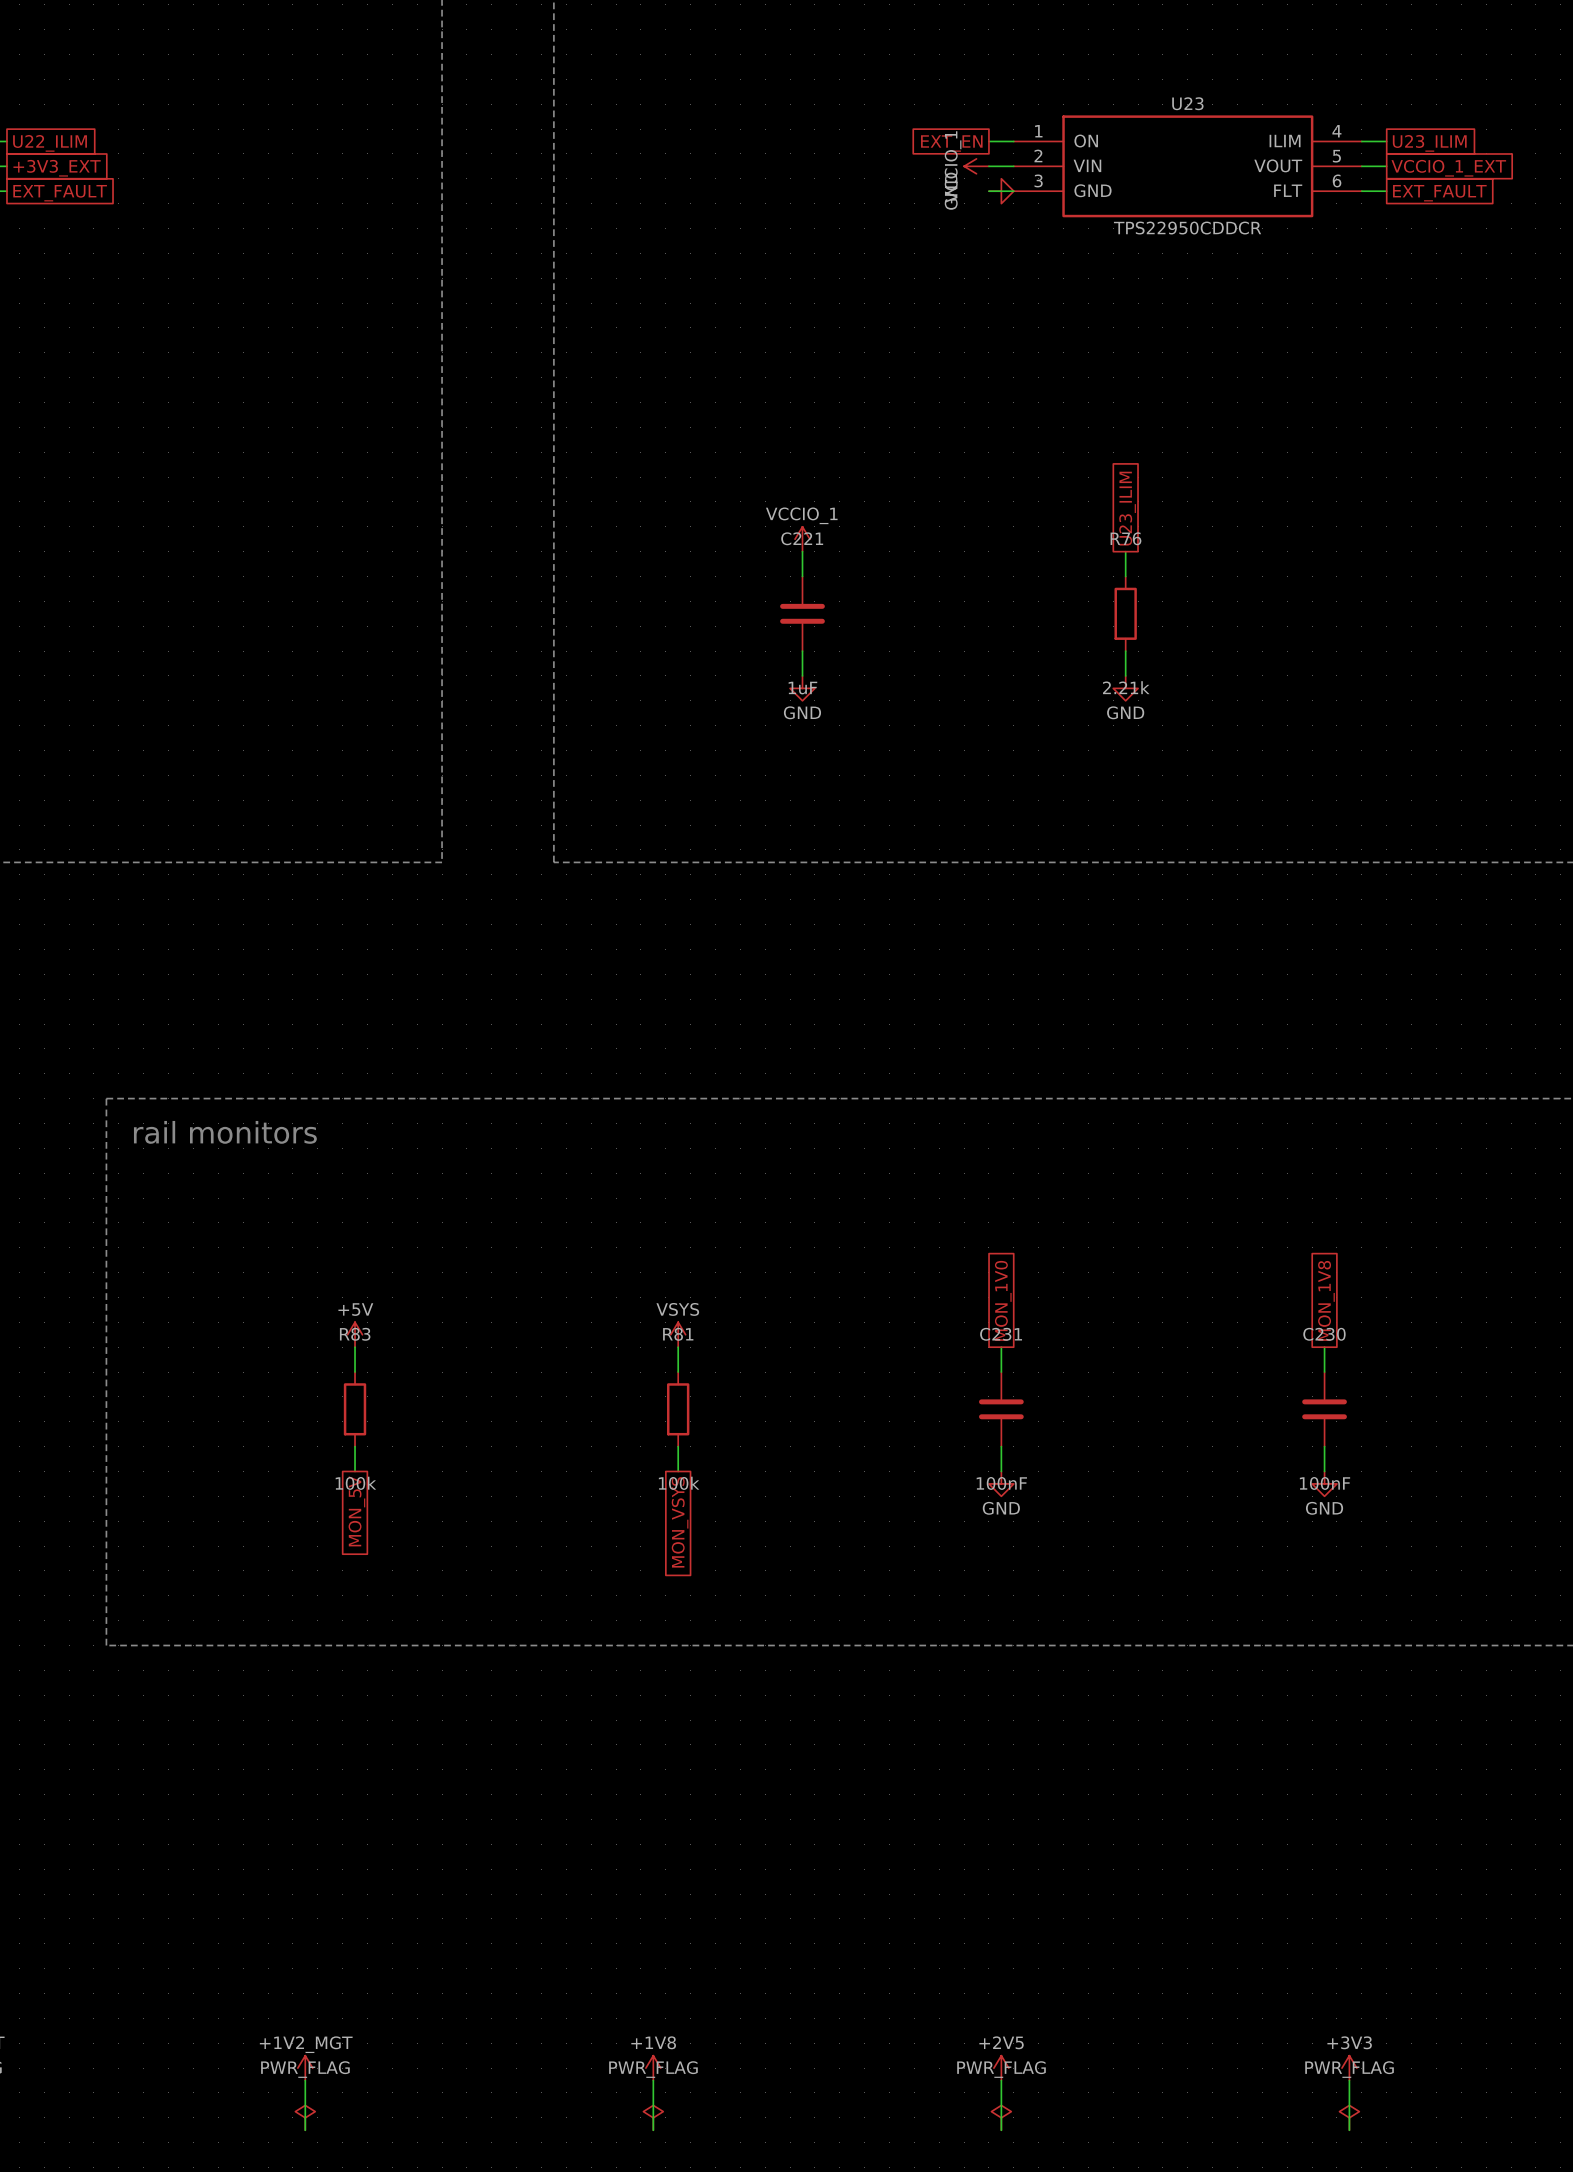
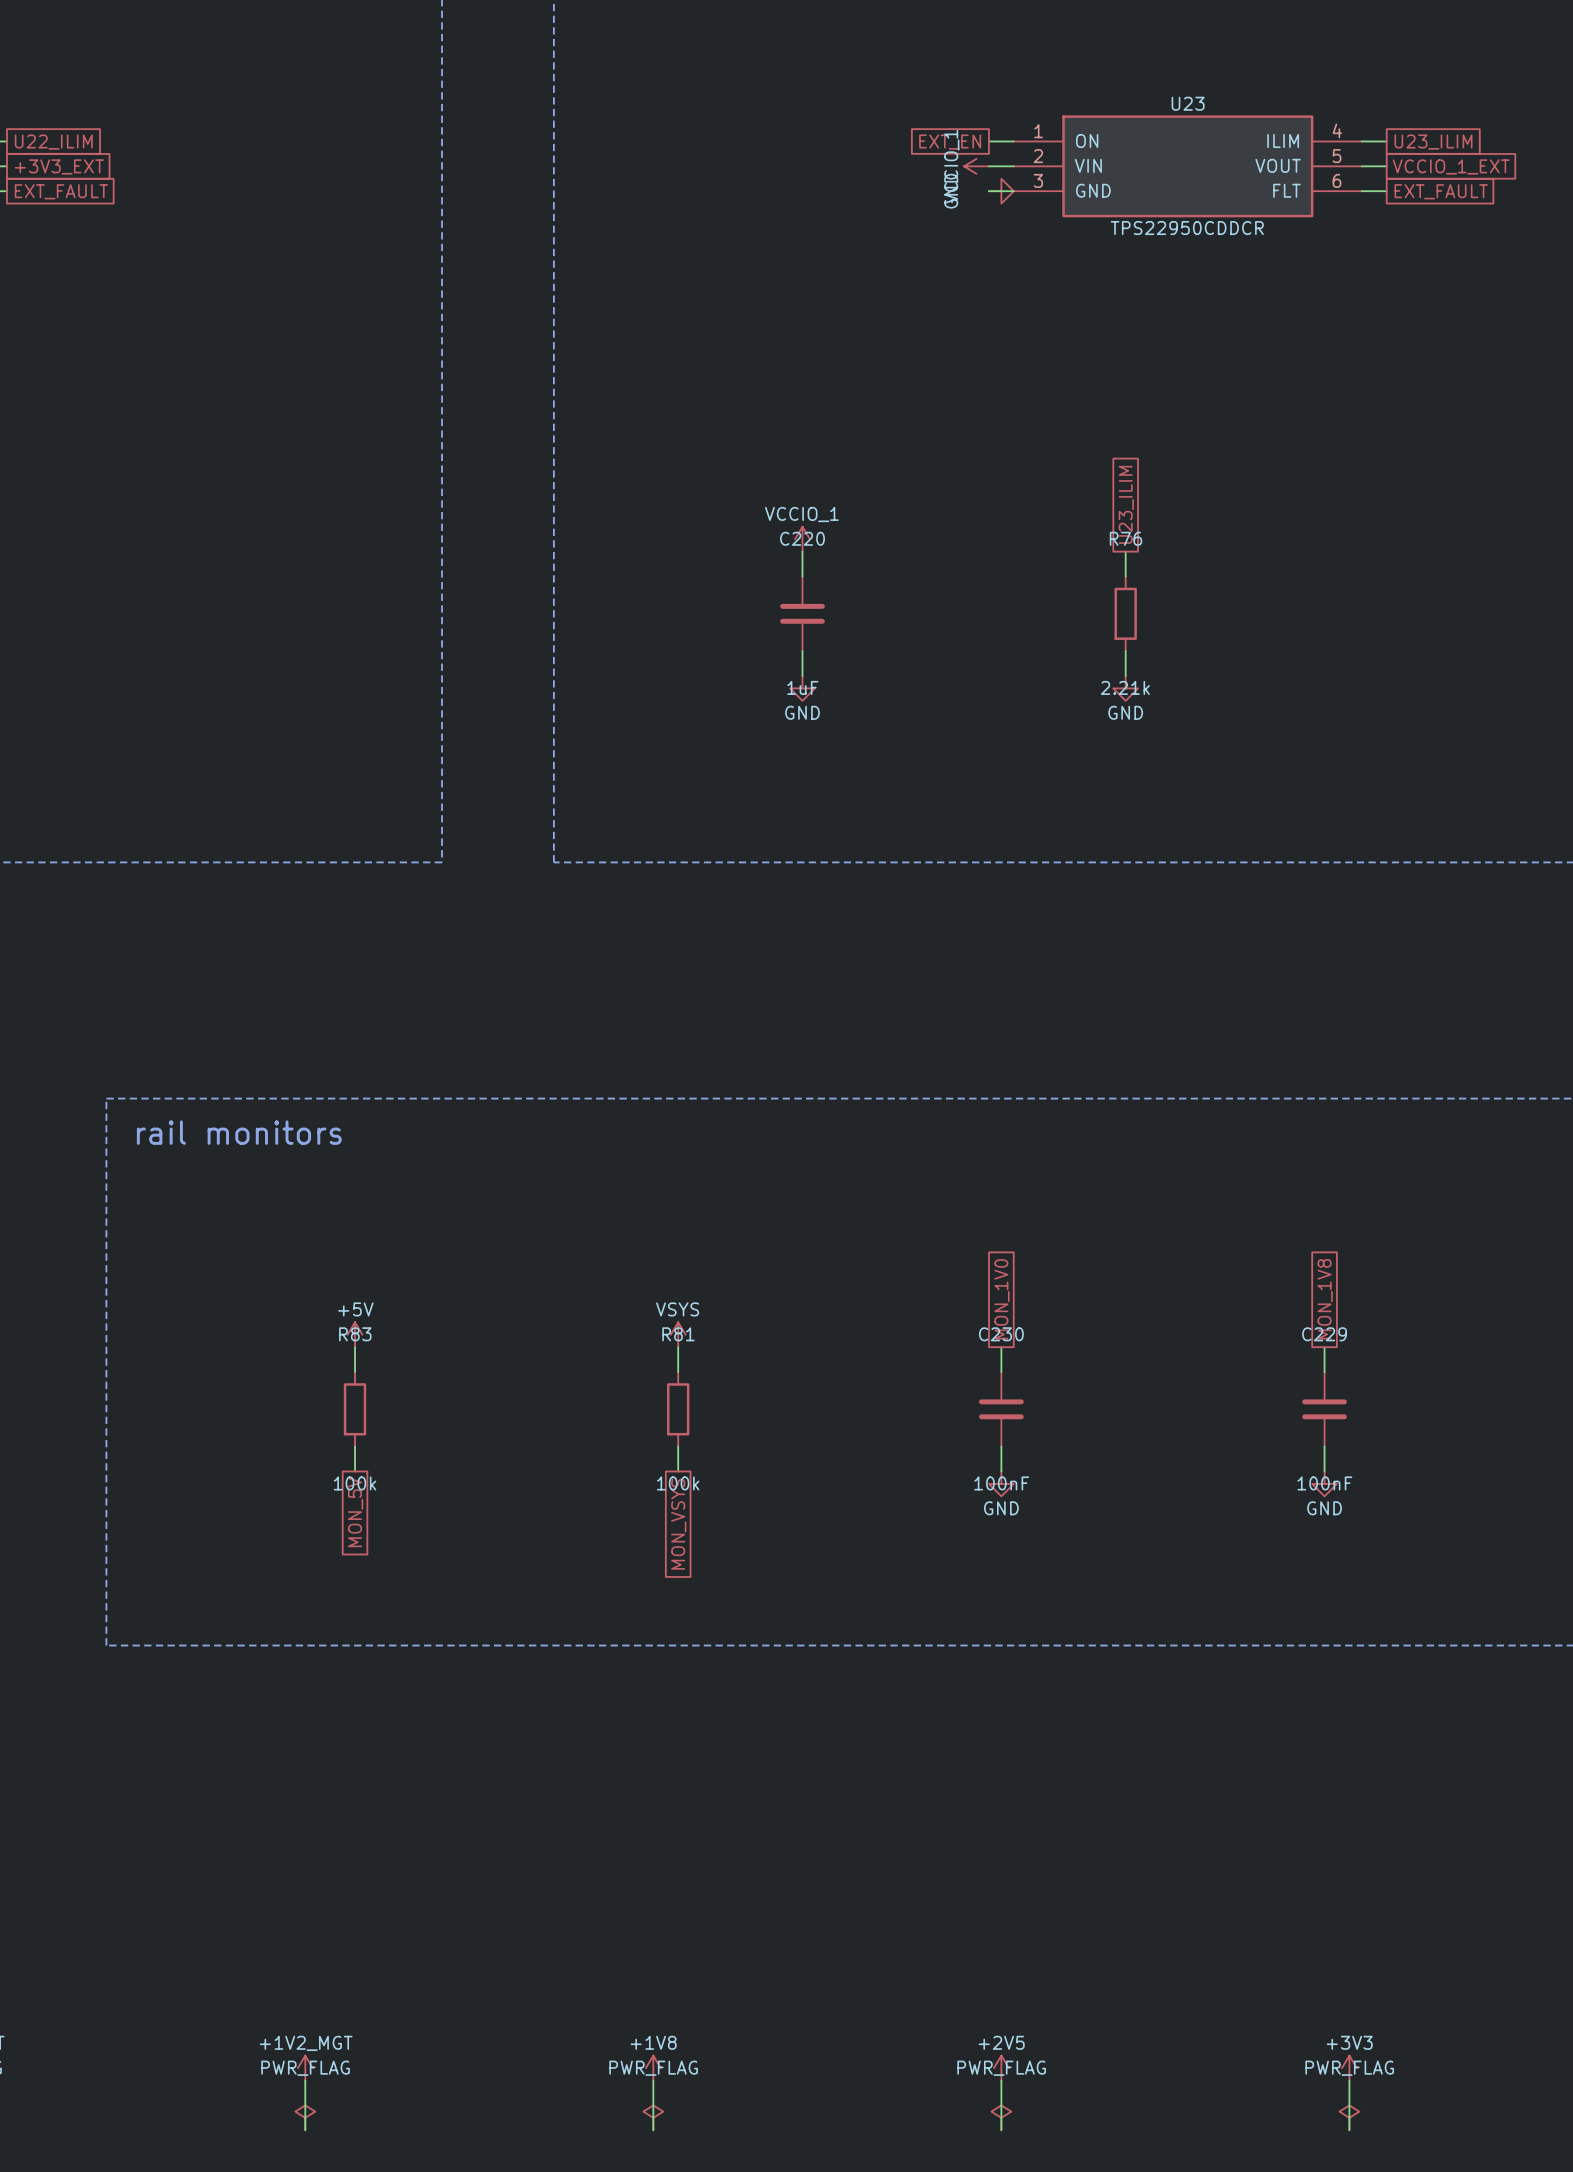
C221 name: C221 (802, 538) -> C220 (802, 538)
C231 name: C231 (1001, 1334) -> C230 (1001, 1334)
C230 name: C230 (1324, 1334) -> C229 (1324, 1334)

